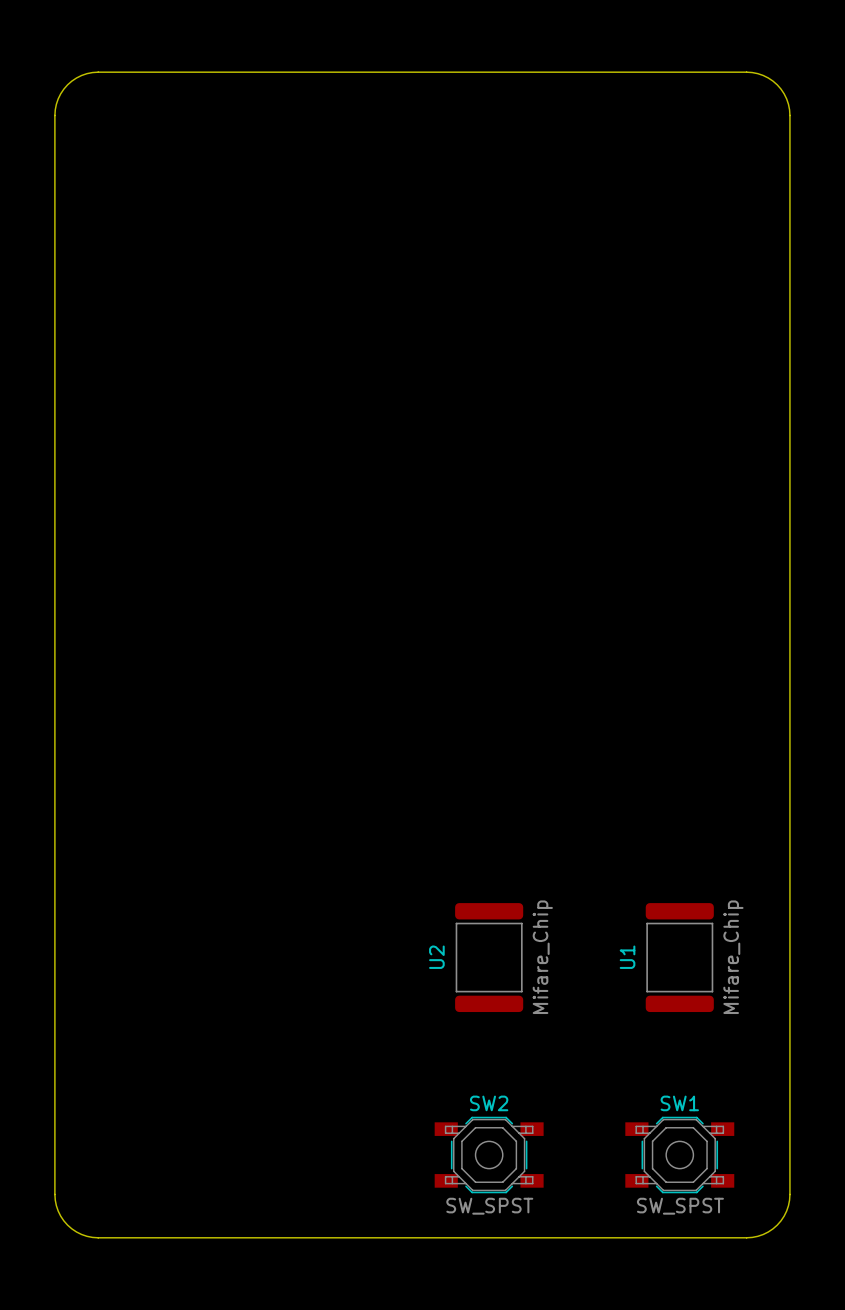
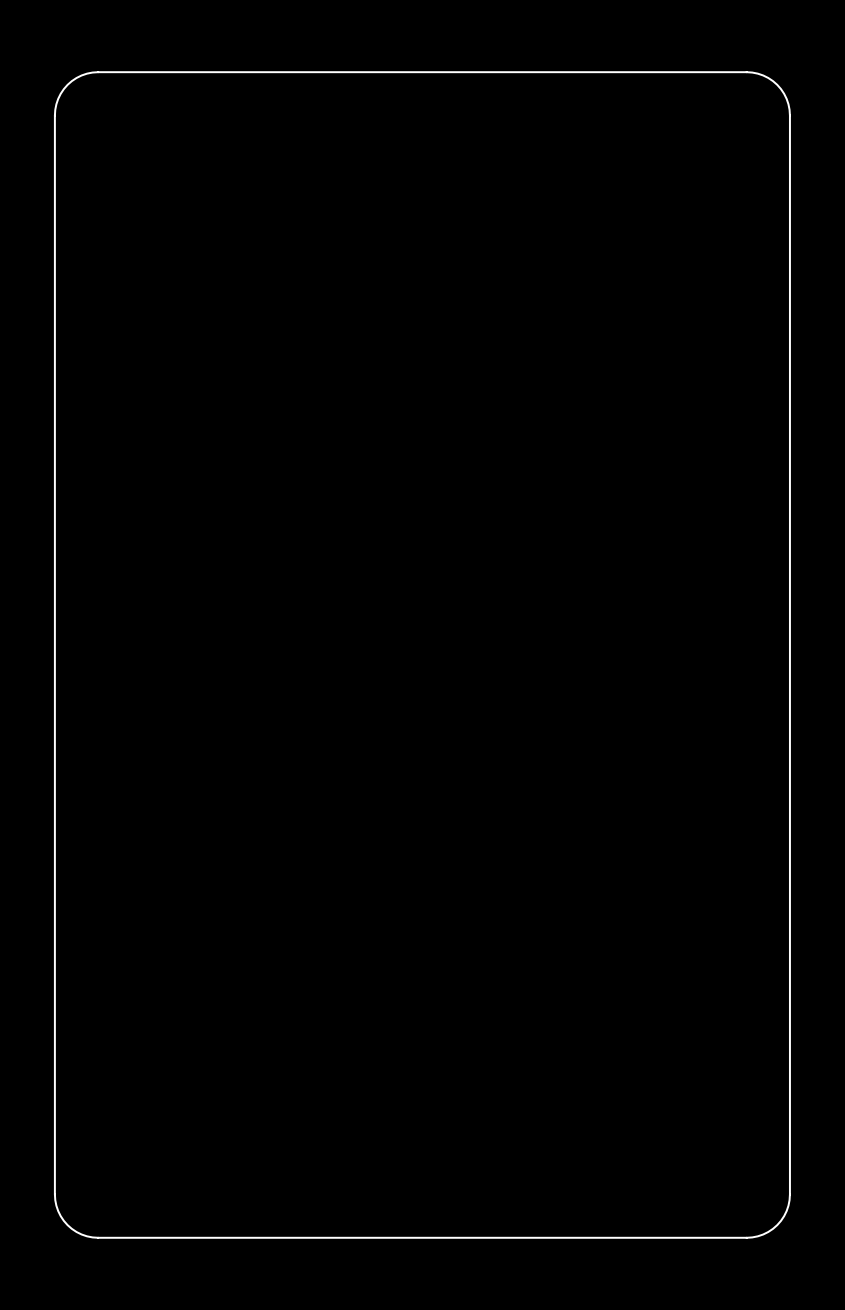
U2: Mifare_Chip (489, 957) -> none
U1: Mifare_Chip (679, 957) -> none
SW2: SW_SPST (489, 1155) -> none
SW1: SW_SPST (679, 1155) -> none

